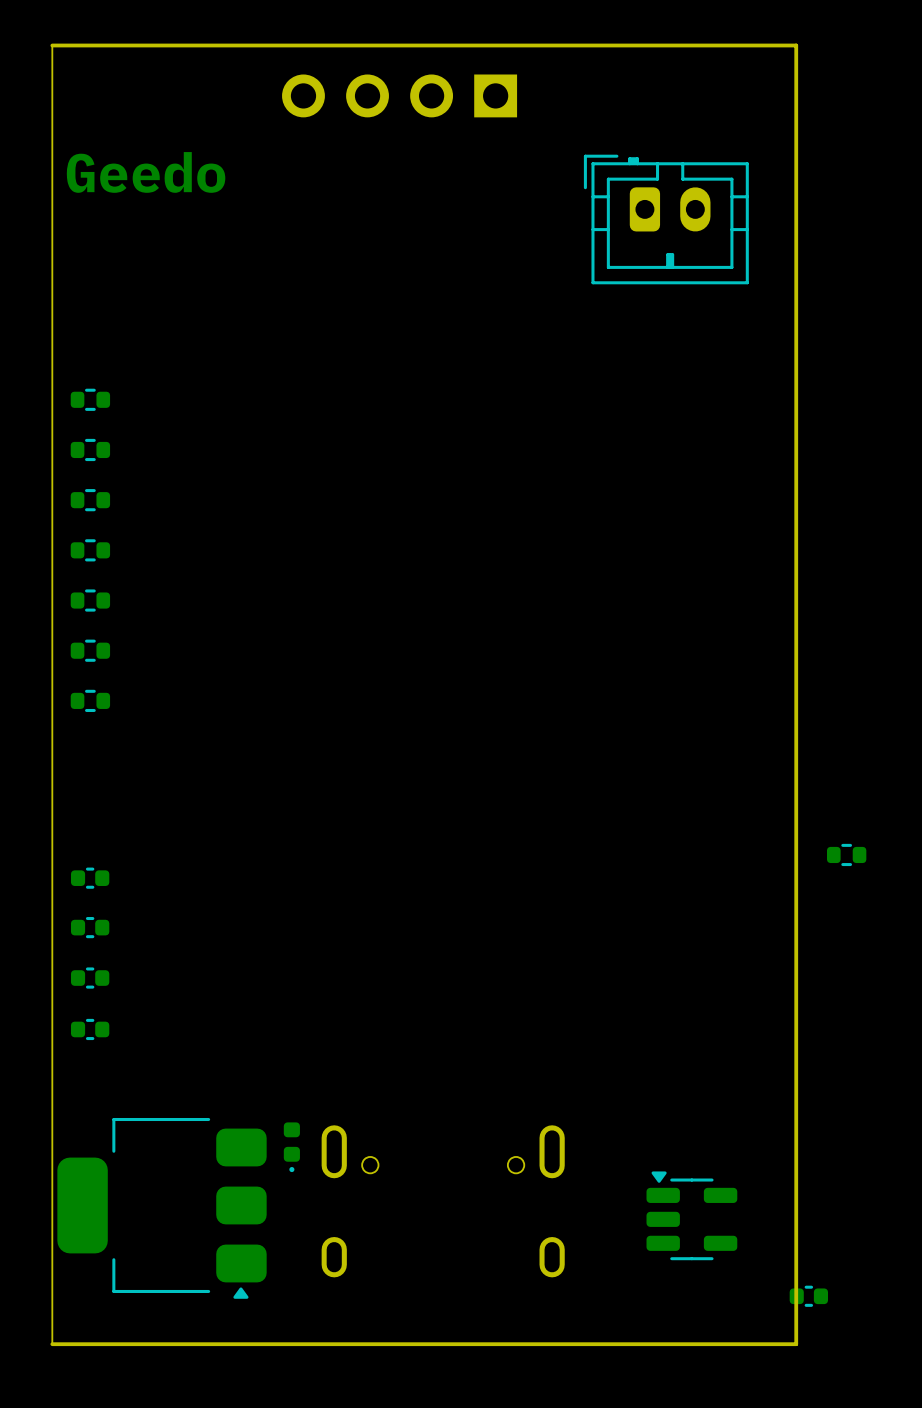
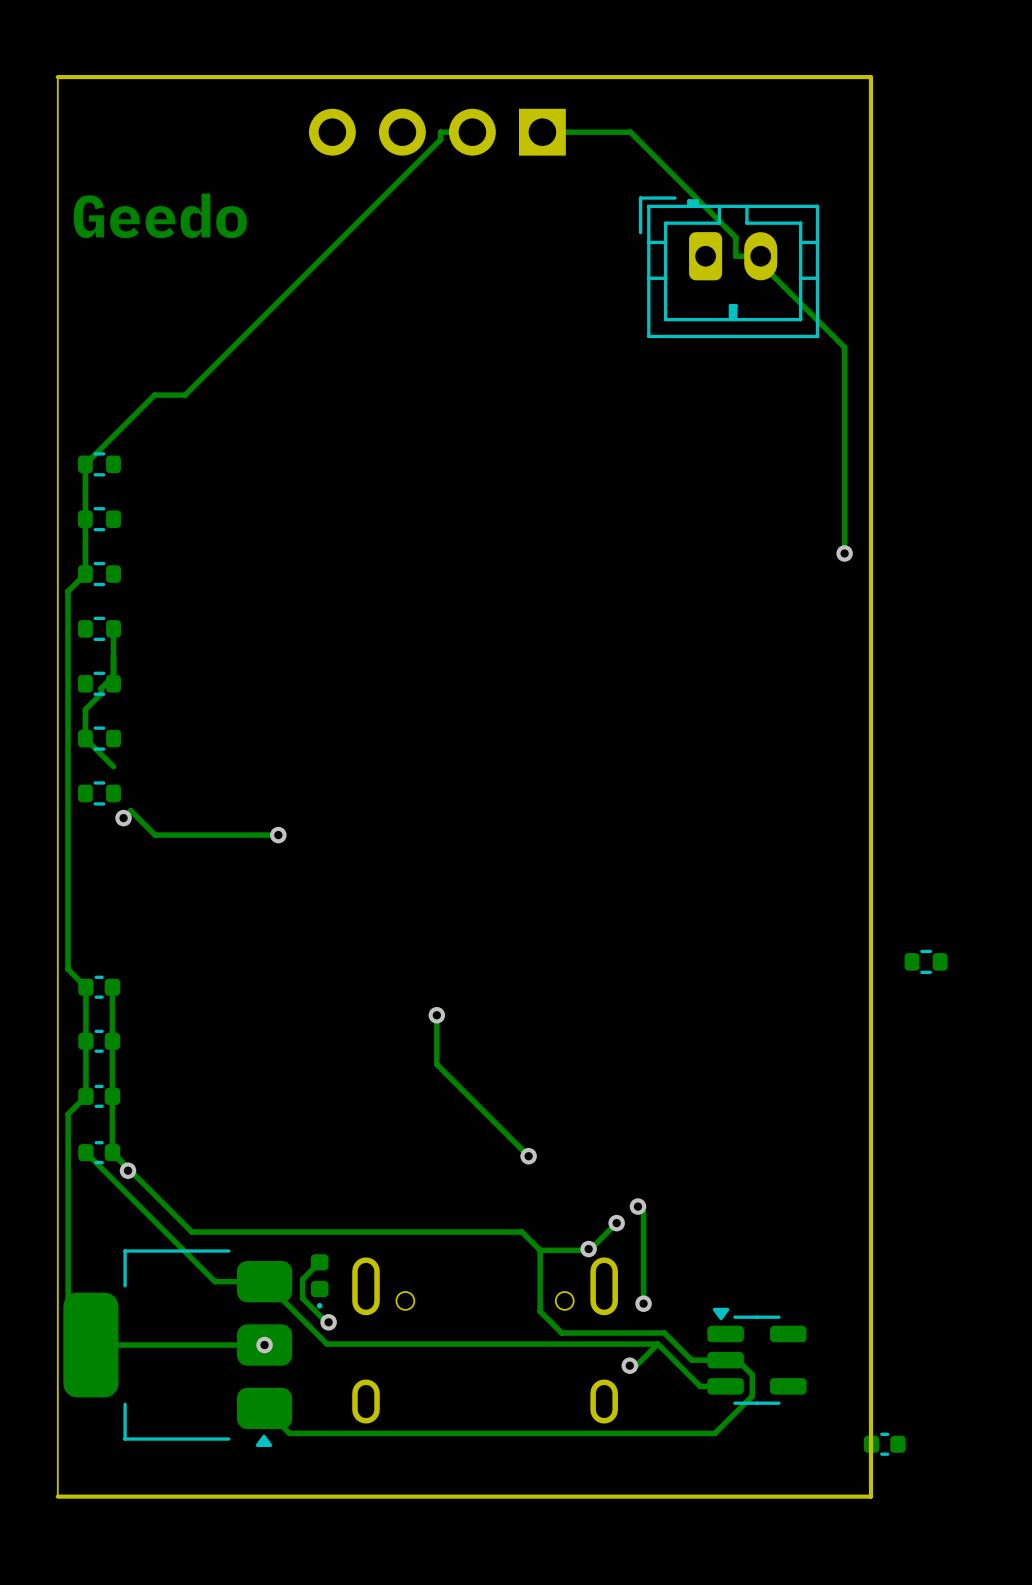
track: none -> (472, 132) (440, 132) (440, 139) (185, 395) (154, 395) (85, 464) (85, 574) (68, 591) (68, 969) (85, 987) (85, 1096) (68, 1114) (68, 1322) (90, 1345) (264, 1345) (267, 1348)
track: none -> (542, 132) (630, 132) (735, 237) (735, 256) (760, 256)
track: none -> (753, 256) (844, 347) (844, 553)
via: none -> (844, 553)
track: none -> (113, 628) (113, 683)
track: none -> (113, 676) (101, 688) (101, 693) (85, 709) (85, 738) (113, 766)
track: none -> (123, 818) (130, 810) (155, 835) (278, 835)
via: none -> (123, 818)
via: none -> (278, 835)
track: none -> (112, 987) (112, 1152) (191, 1232) (521, 1232) (540, 1250)
track: none -> (436, 1015) (436, 1064) (528, 1156)
via: none -> (436, 1015)
track: none -> (85, 1152) (214, 1281) (264, 1281) (327, 1344) (657, 1344)
via: none -> (528, 1156)
via: none -> (128, 1170)
track: none -> (638, 1206) (643, 1212) (643, 1303)
via: none -> (638, 1206)
track: none -> (616, 1223) (589, 1250)
via: none -> (616, 1223)
via: none -> (588, 1249)
track: none -> (540, 1250) (540, 1311) (561, 1332) (664, 1332) (691, 1360) (737, 1360) (752, 1374) (752, 1396) (715, 1433) (289, 1433) (264, 1408)
track: none -> (589, 1250) (540, 1250)
track: none -> (319, 1262) (302, 1279) (302, 1298) (328, 1322)
via: none -> (643, 1303)
via: none -> (328, 1322)
track: none -> (657, 1344) (636, 1365) (629, 1365)
track: none -> (657, 1344) (700, 1386) (725, 1386)
via: none -> (264, 1345)
via: none -> (629, 1365)

